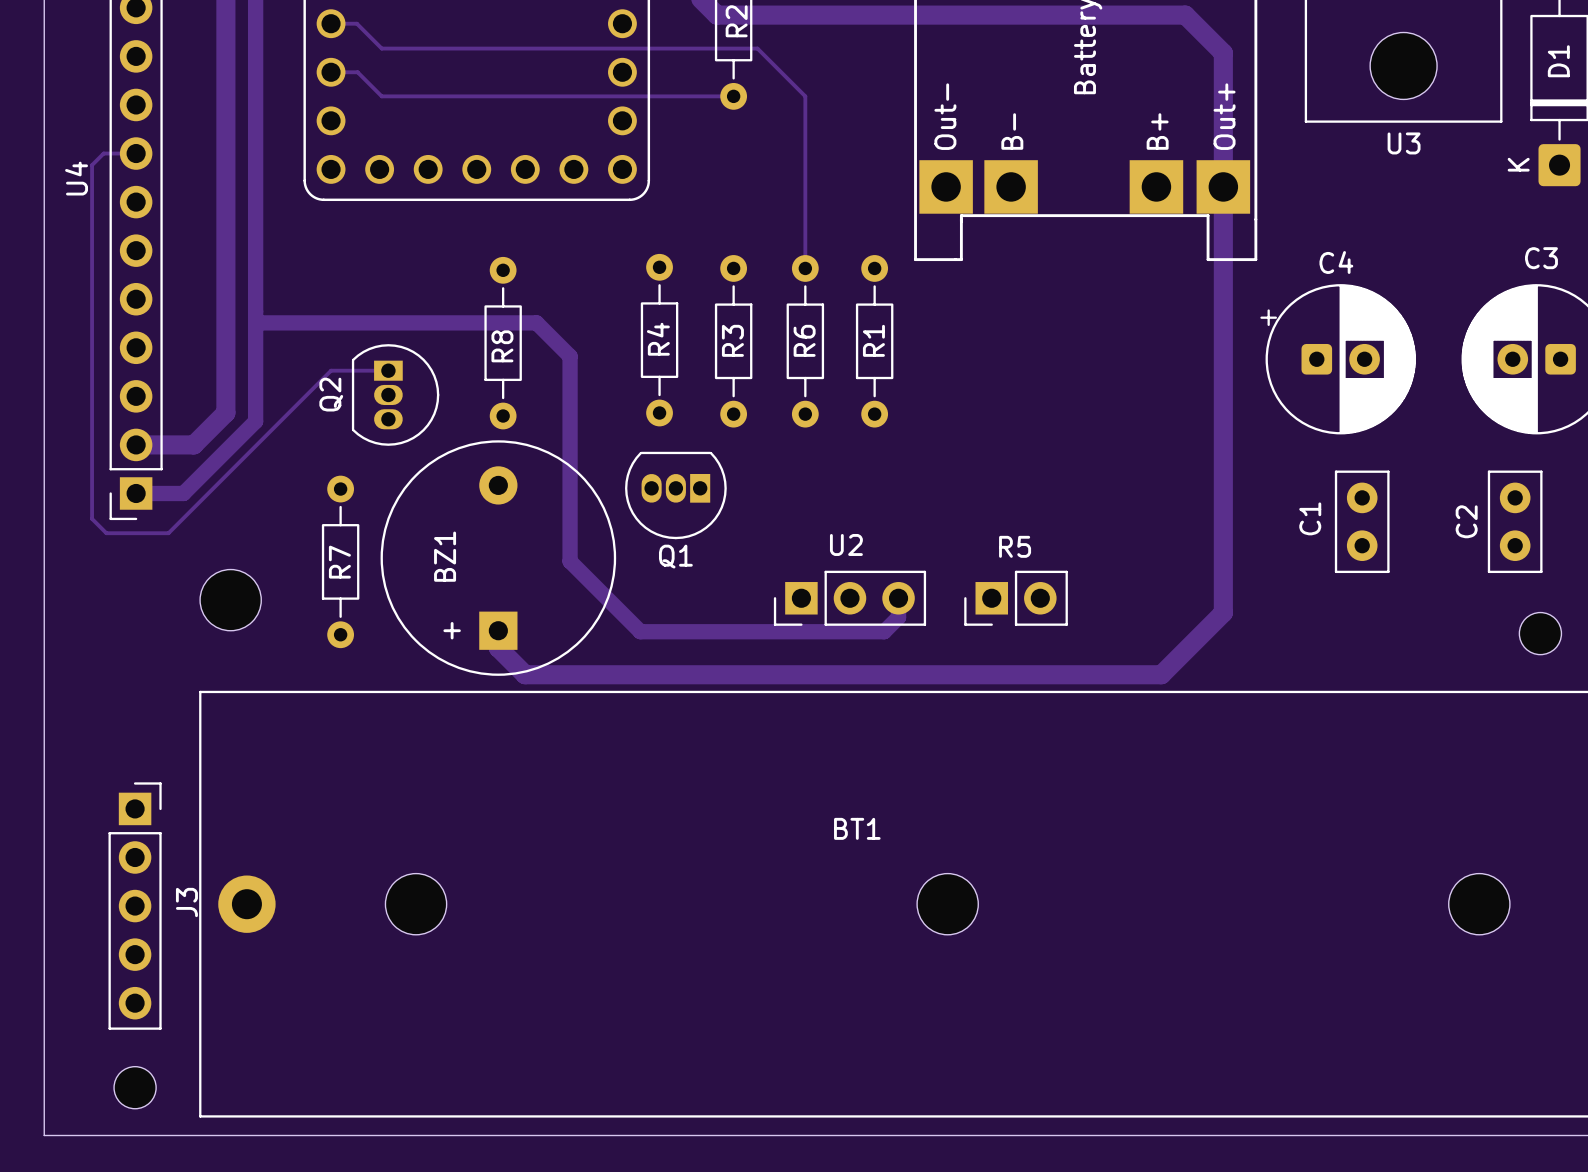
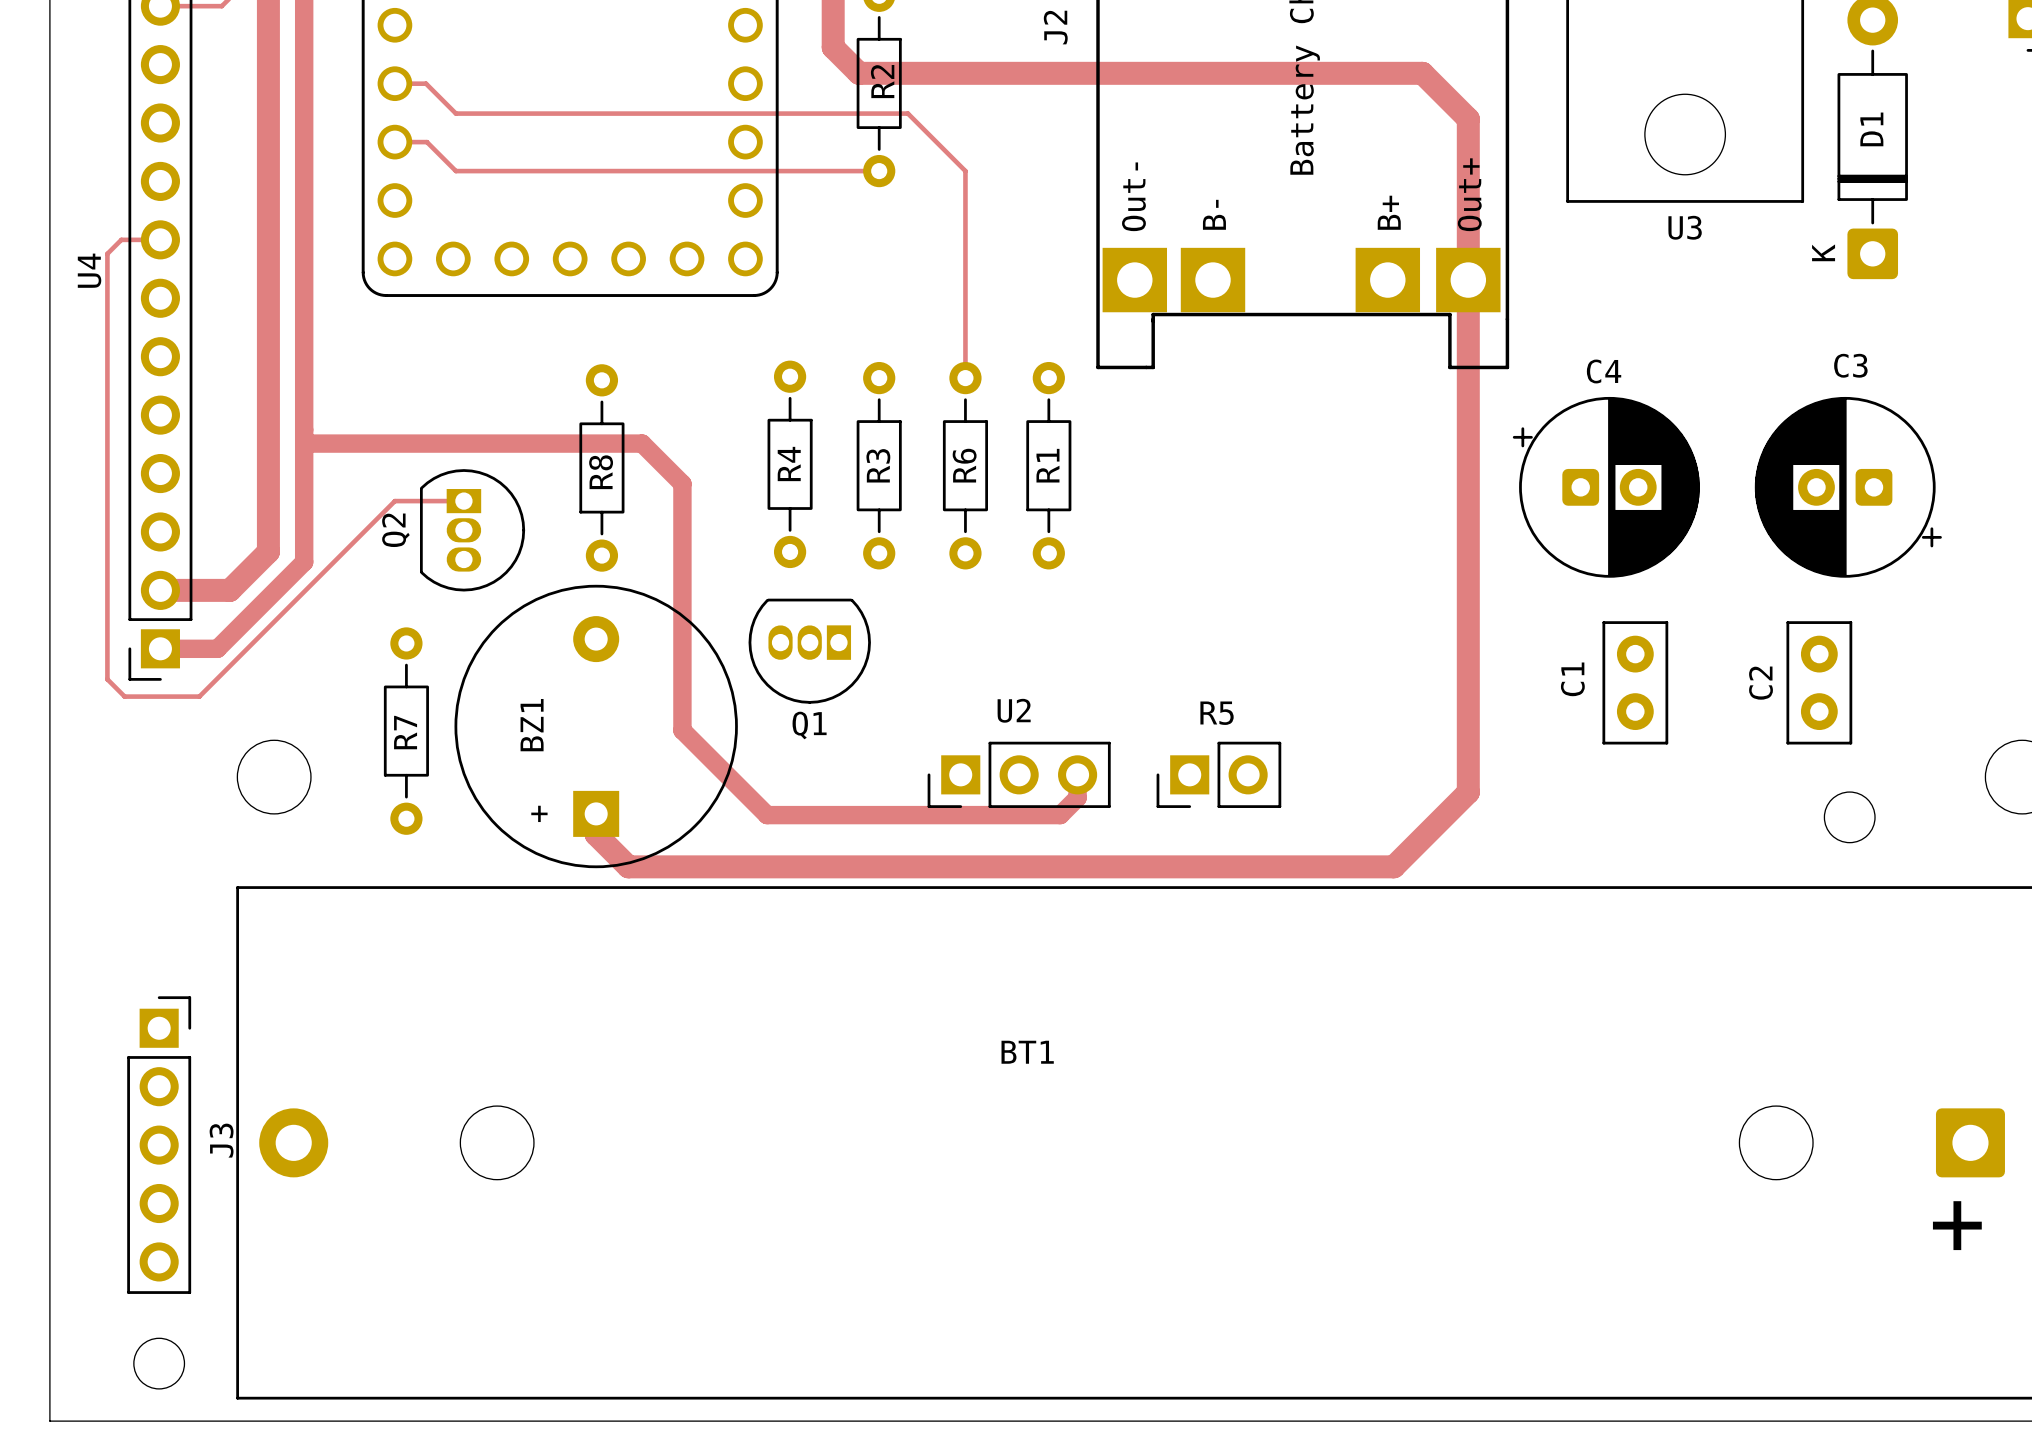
part: (947, 904) -> none

